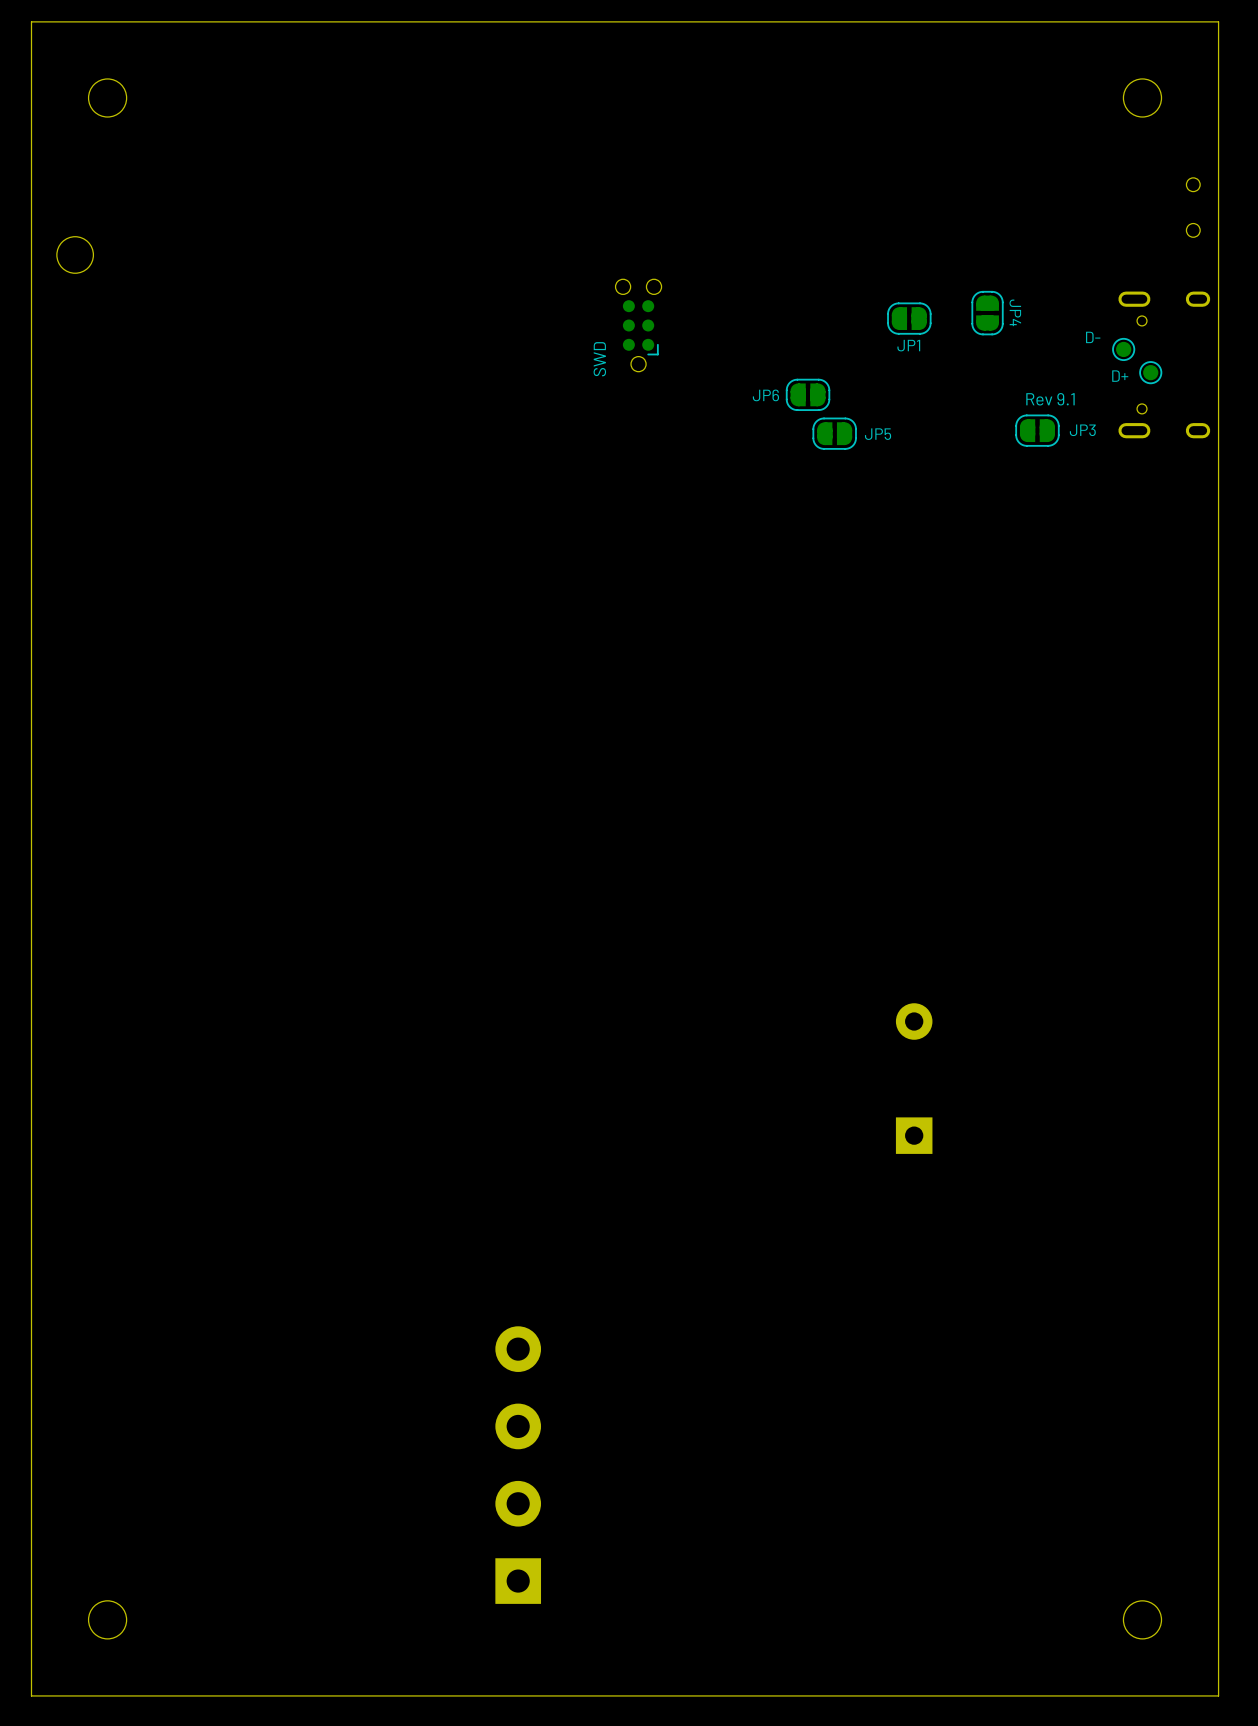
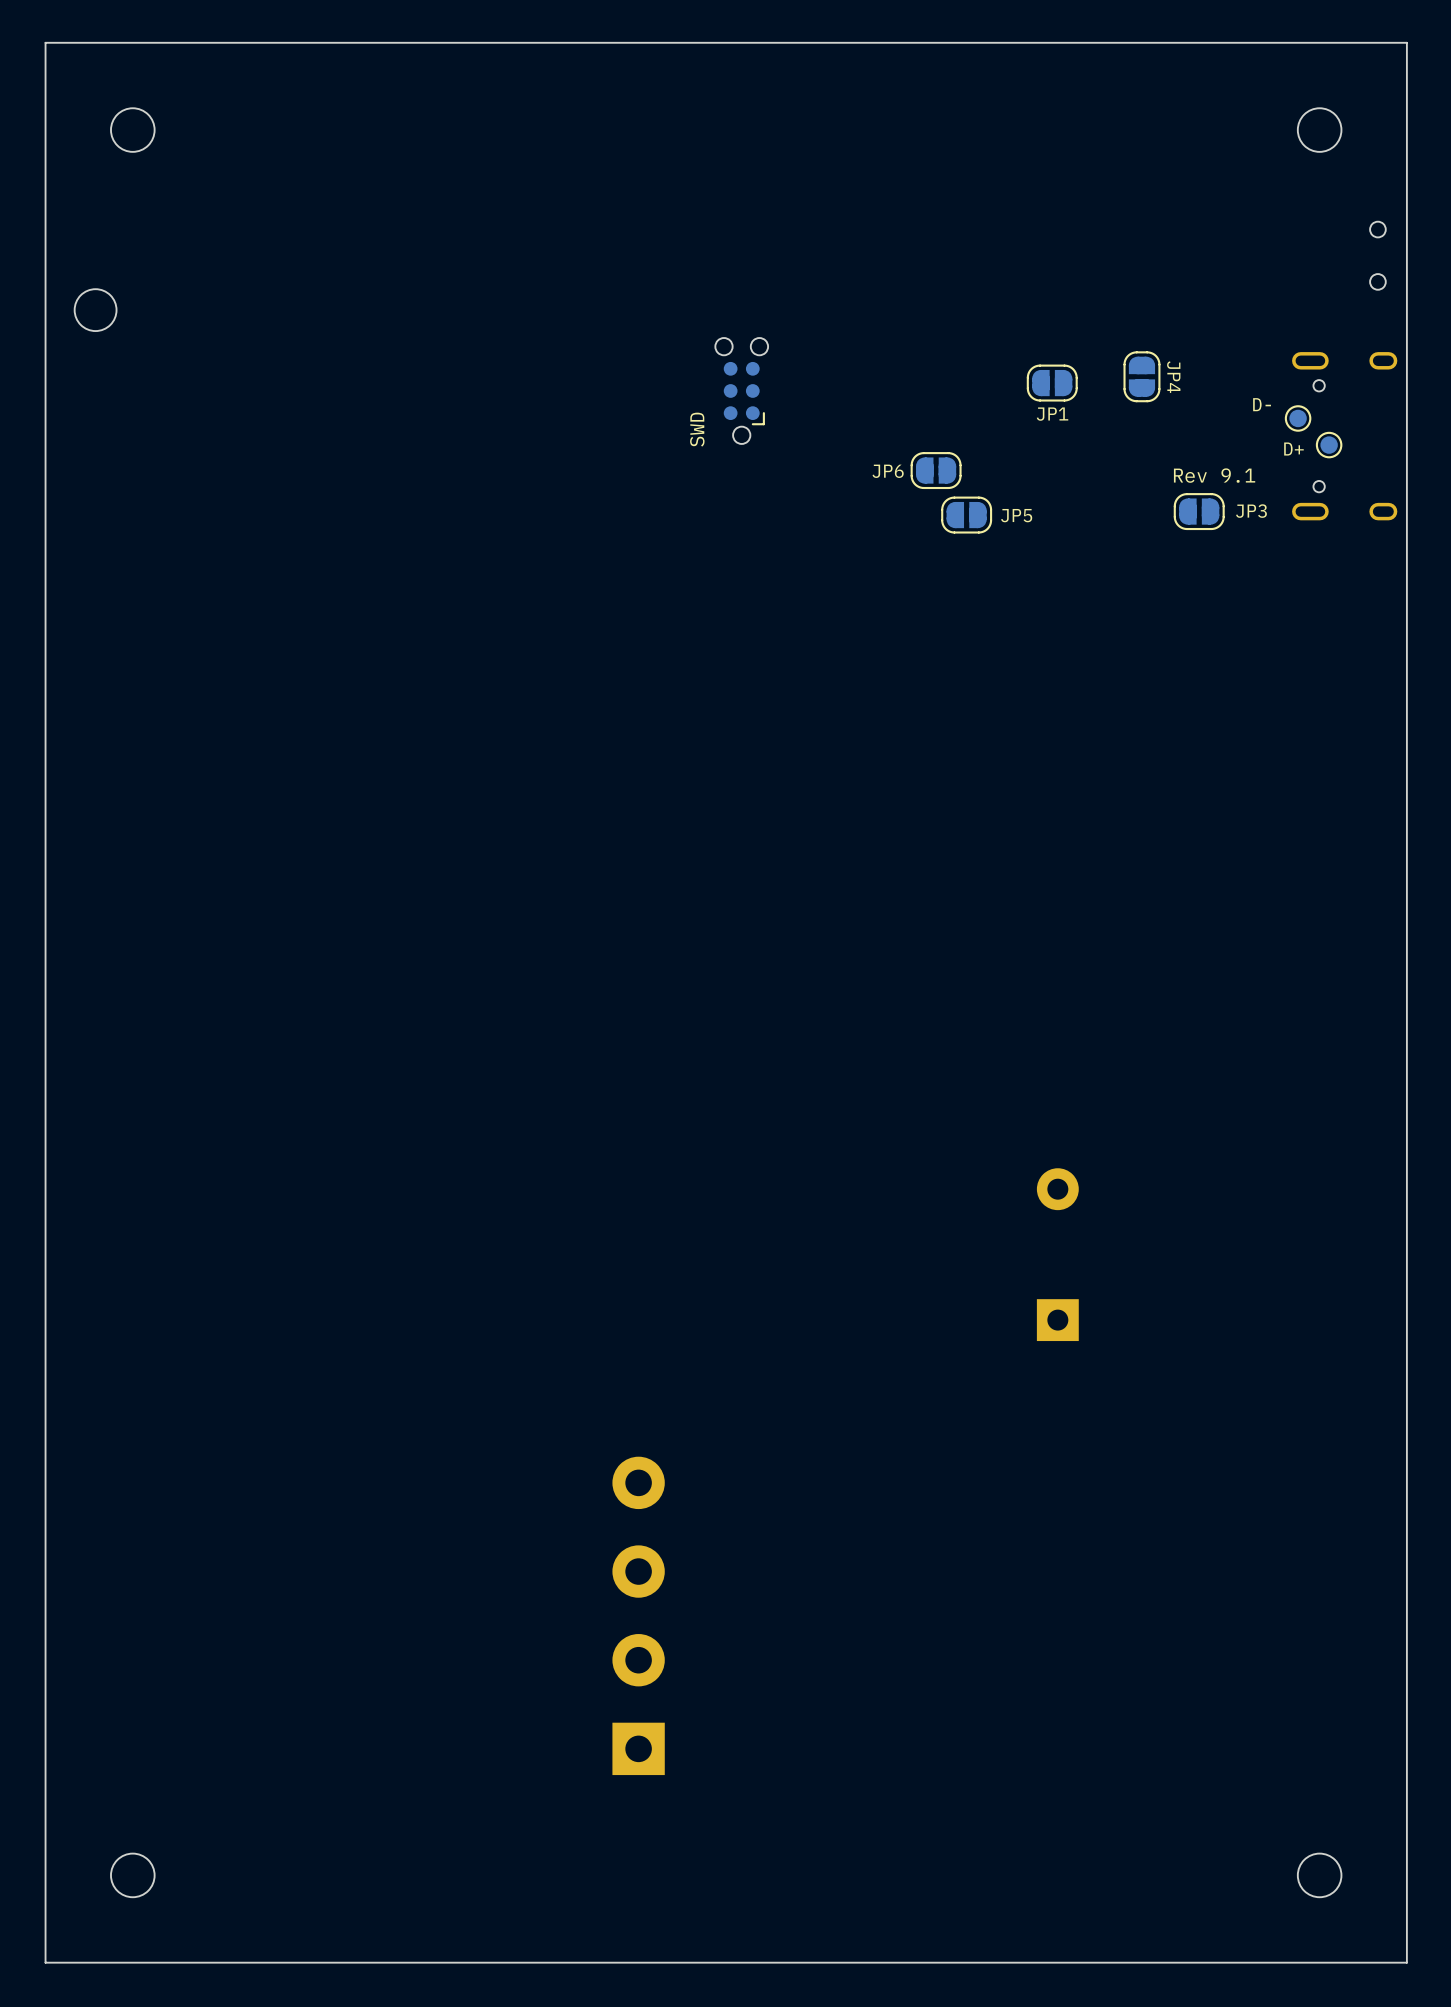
part position: (518, 1465) -> (638, 1615)

